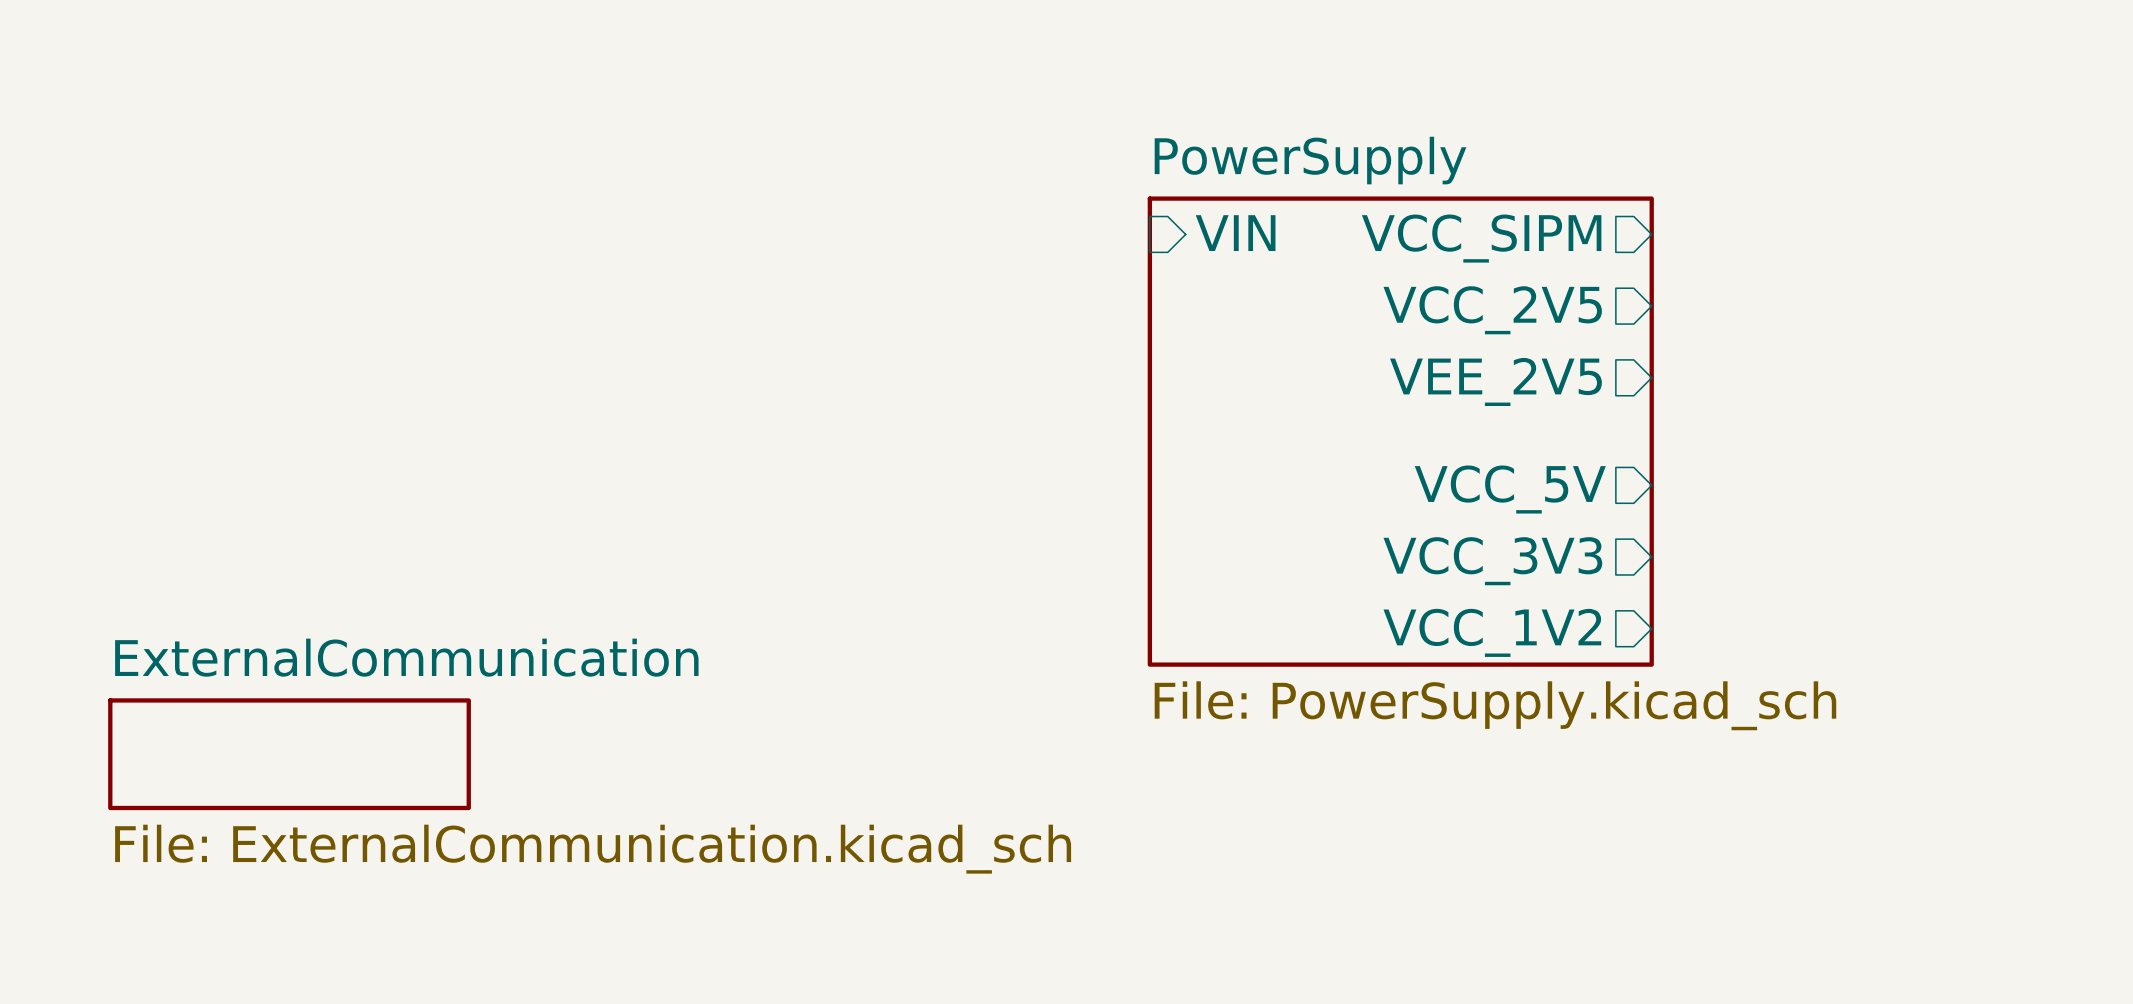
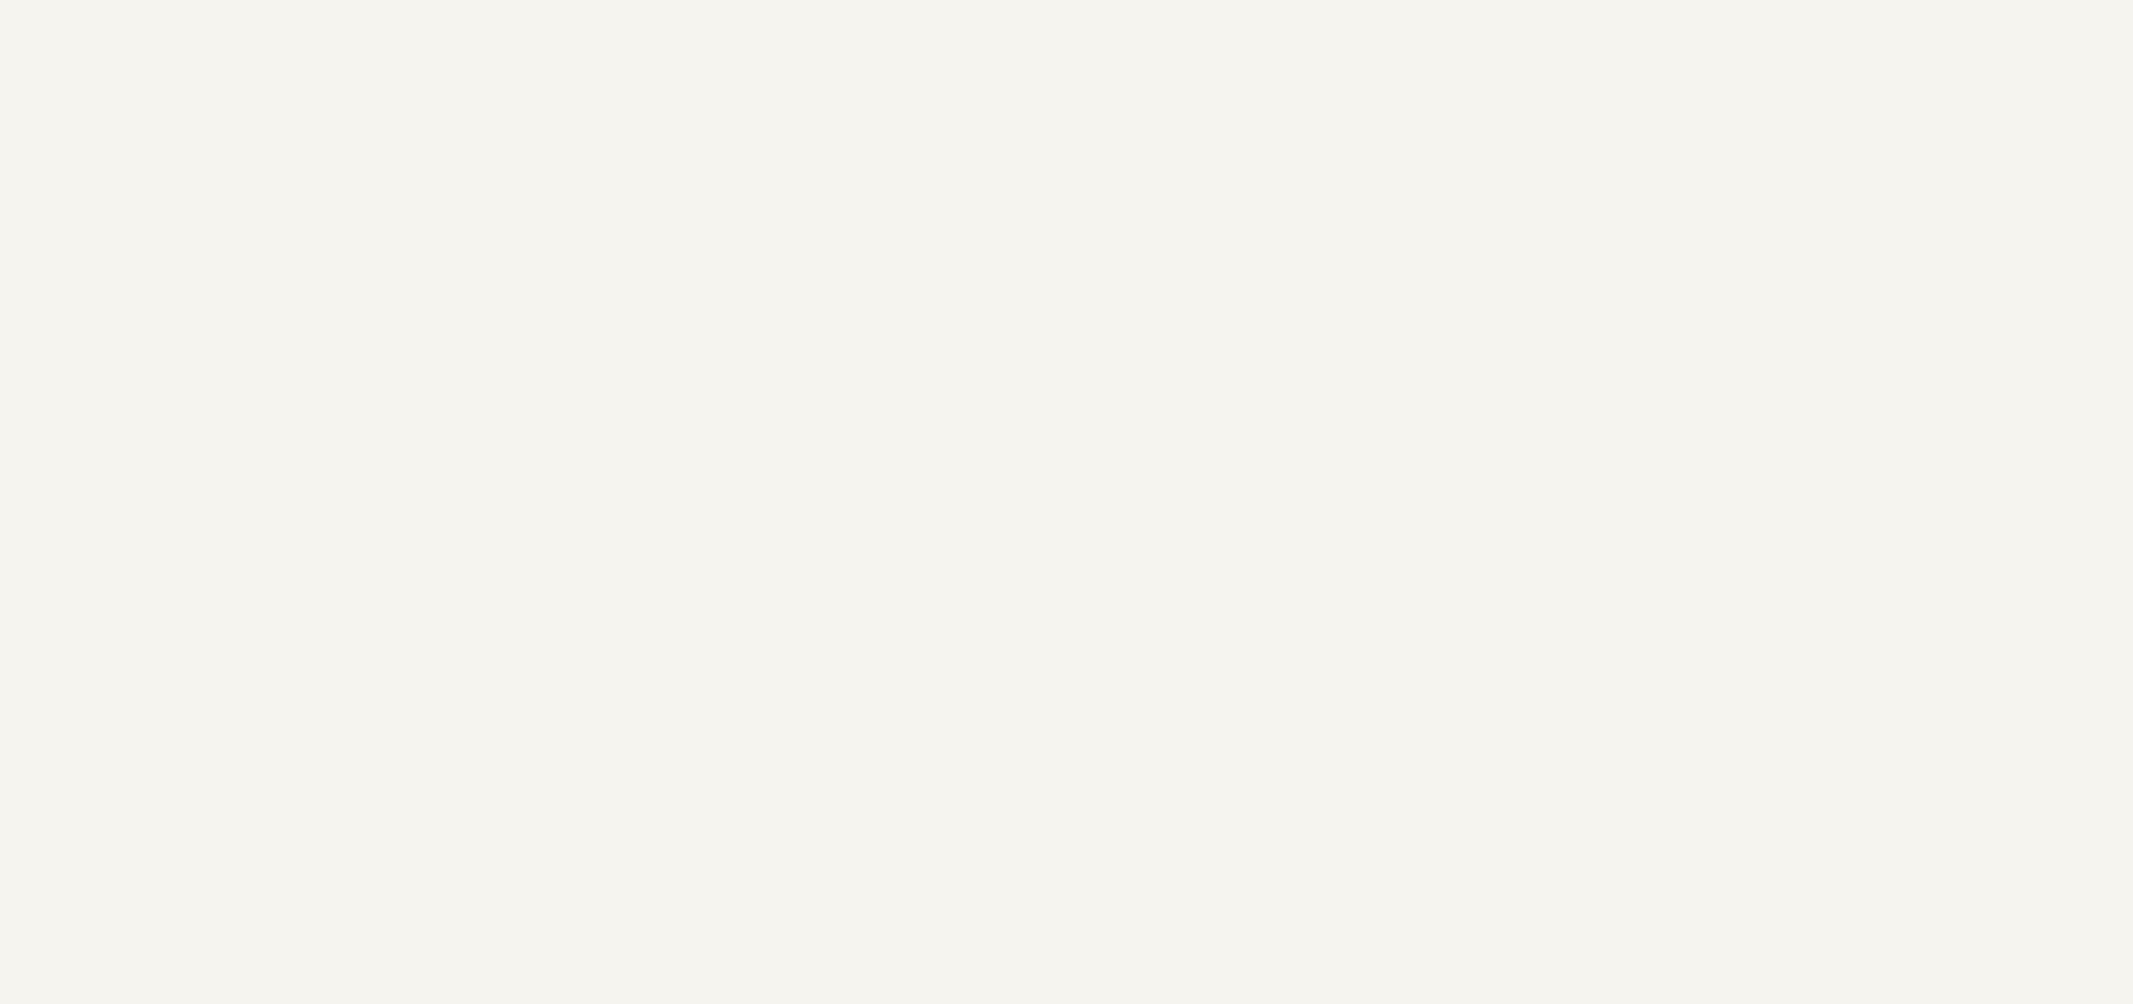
sheet pin: VIN (1235, 233) -> none
sheet pin: VCC_SIPM (1481, 238) -> none
sheet pin: VCC_2V5 (1492, 310) -> none
sheet pin: VEE_2V5 (1495, 381) -> none
sheet PowerSupply: File: PowerSupply.kicad_sch (1400, 431) -> none
sheet pin: VCC_5V (1510, 489) -> none
sheet pin: VCC_3V3 (1492, 561) -> none
sheet pin: VCC_1V2 (1492, 632) -> none
sheet ExternalCommunication: File: ExternalCommunication.kicad_sch (289, 754) -> none

